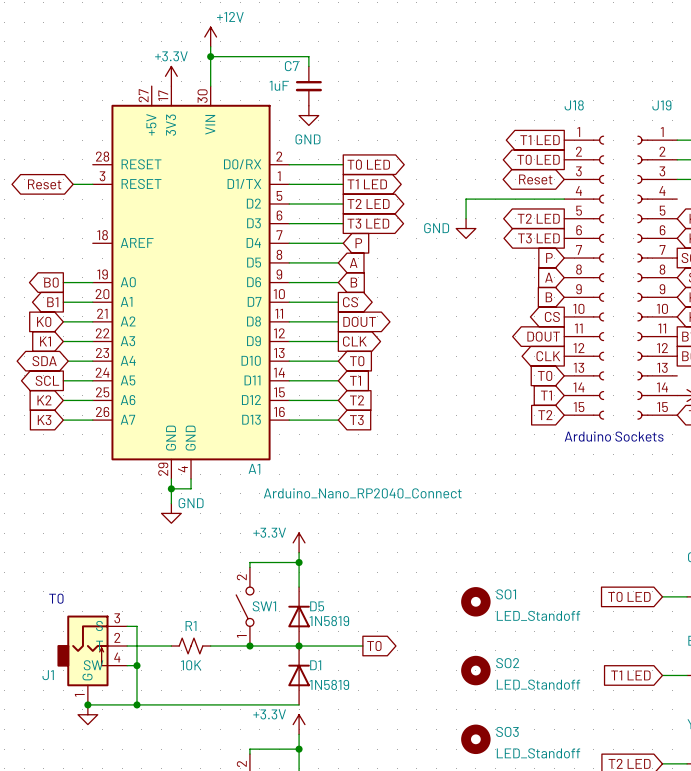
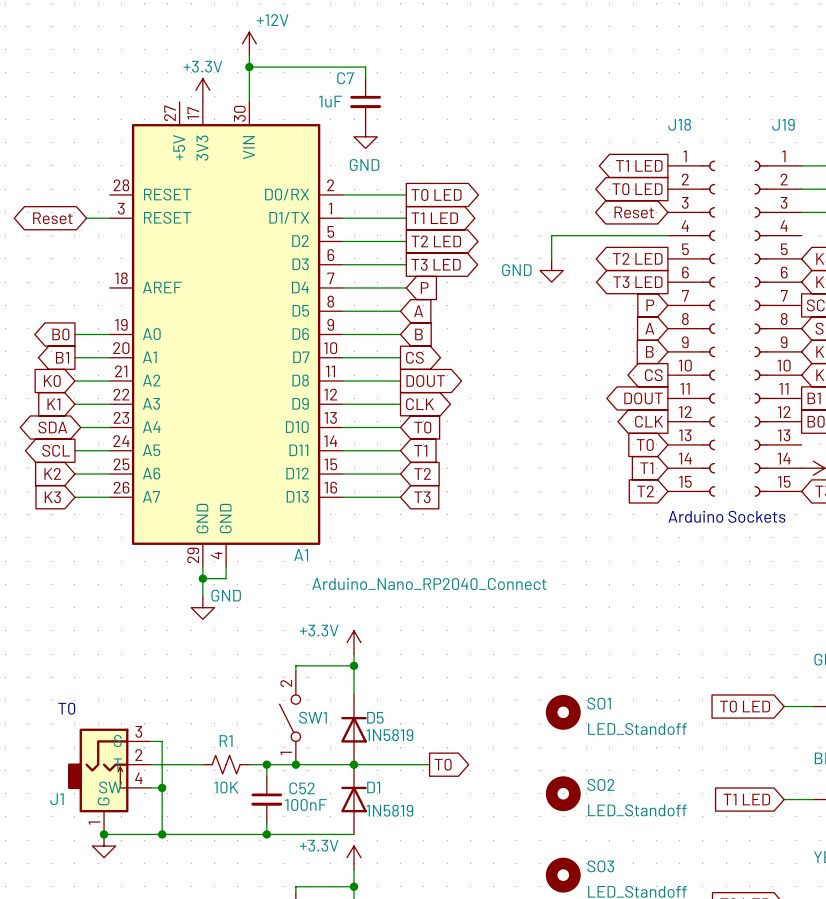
wire: none -> (266, 764) (266, 776)
junction: none -> (266, 764)
C52: none -> 100nF (266, 799)
wire: none -> (266, 822) (266, 834)
junction: none -> (266, 834)

